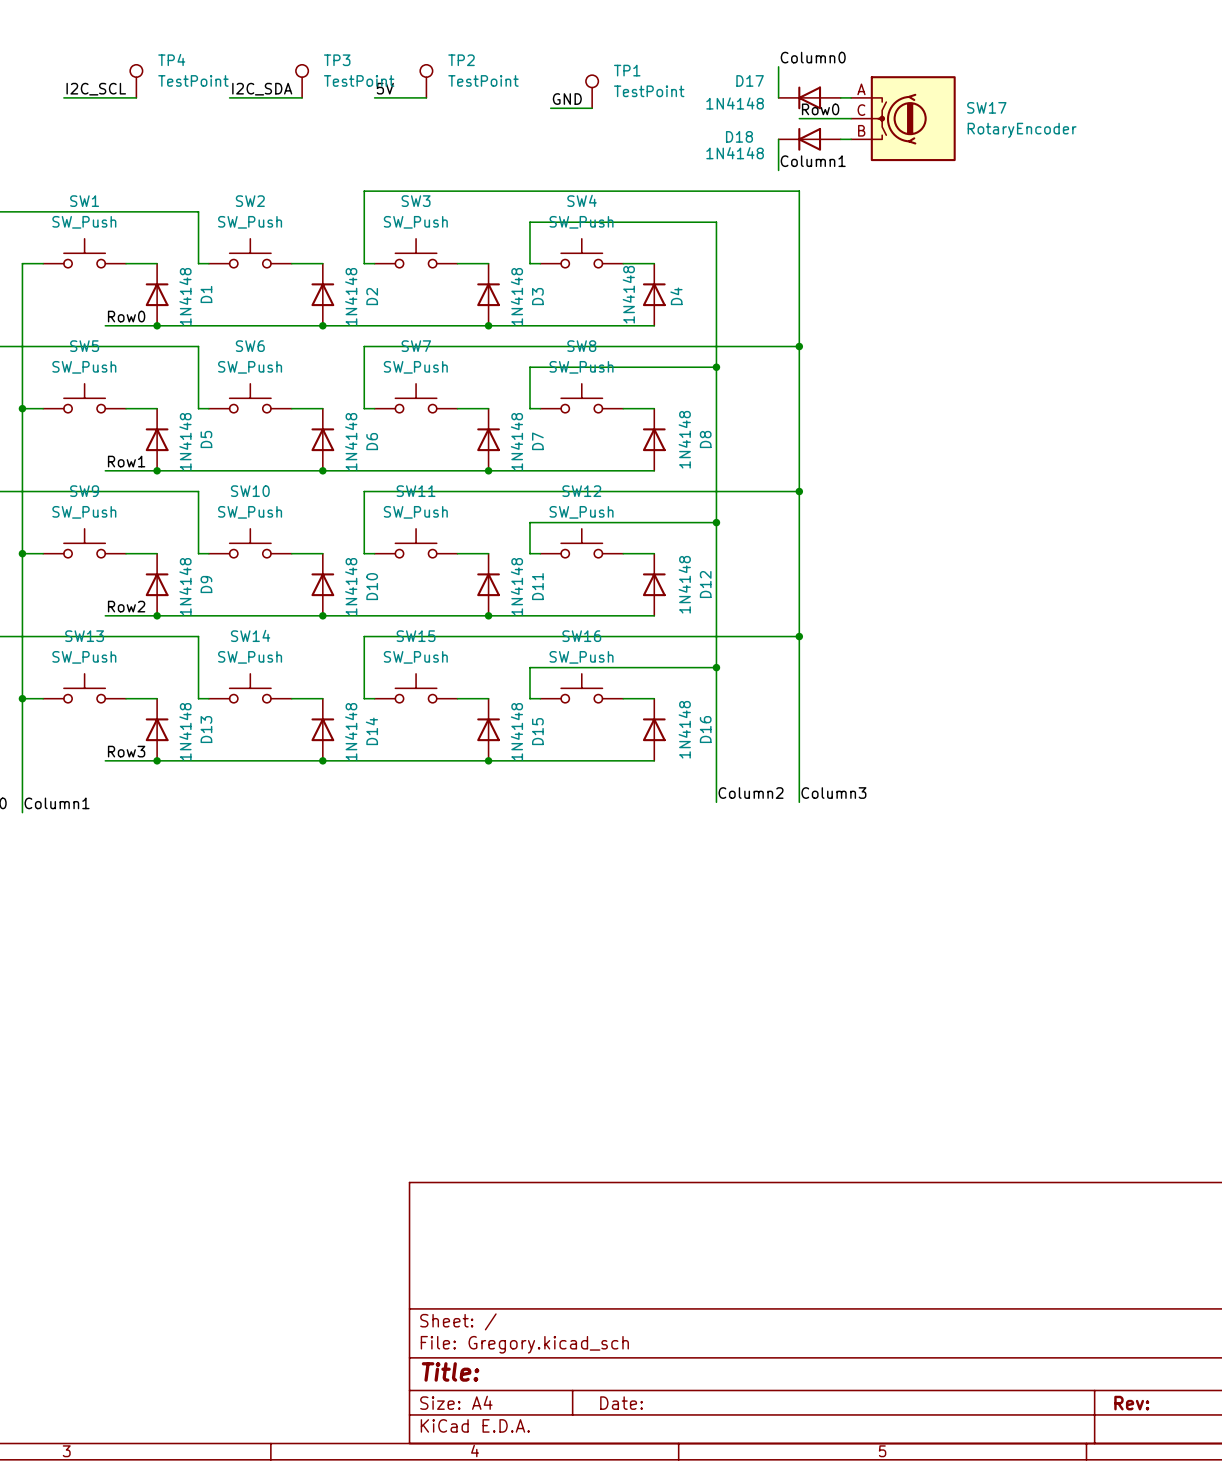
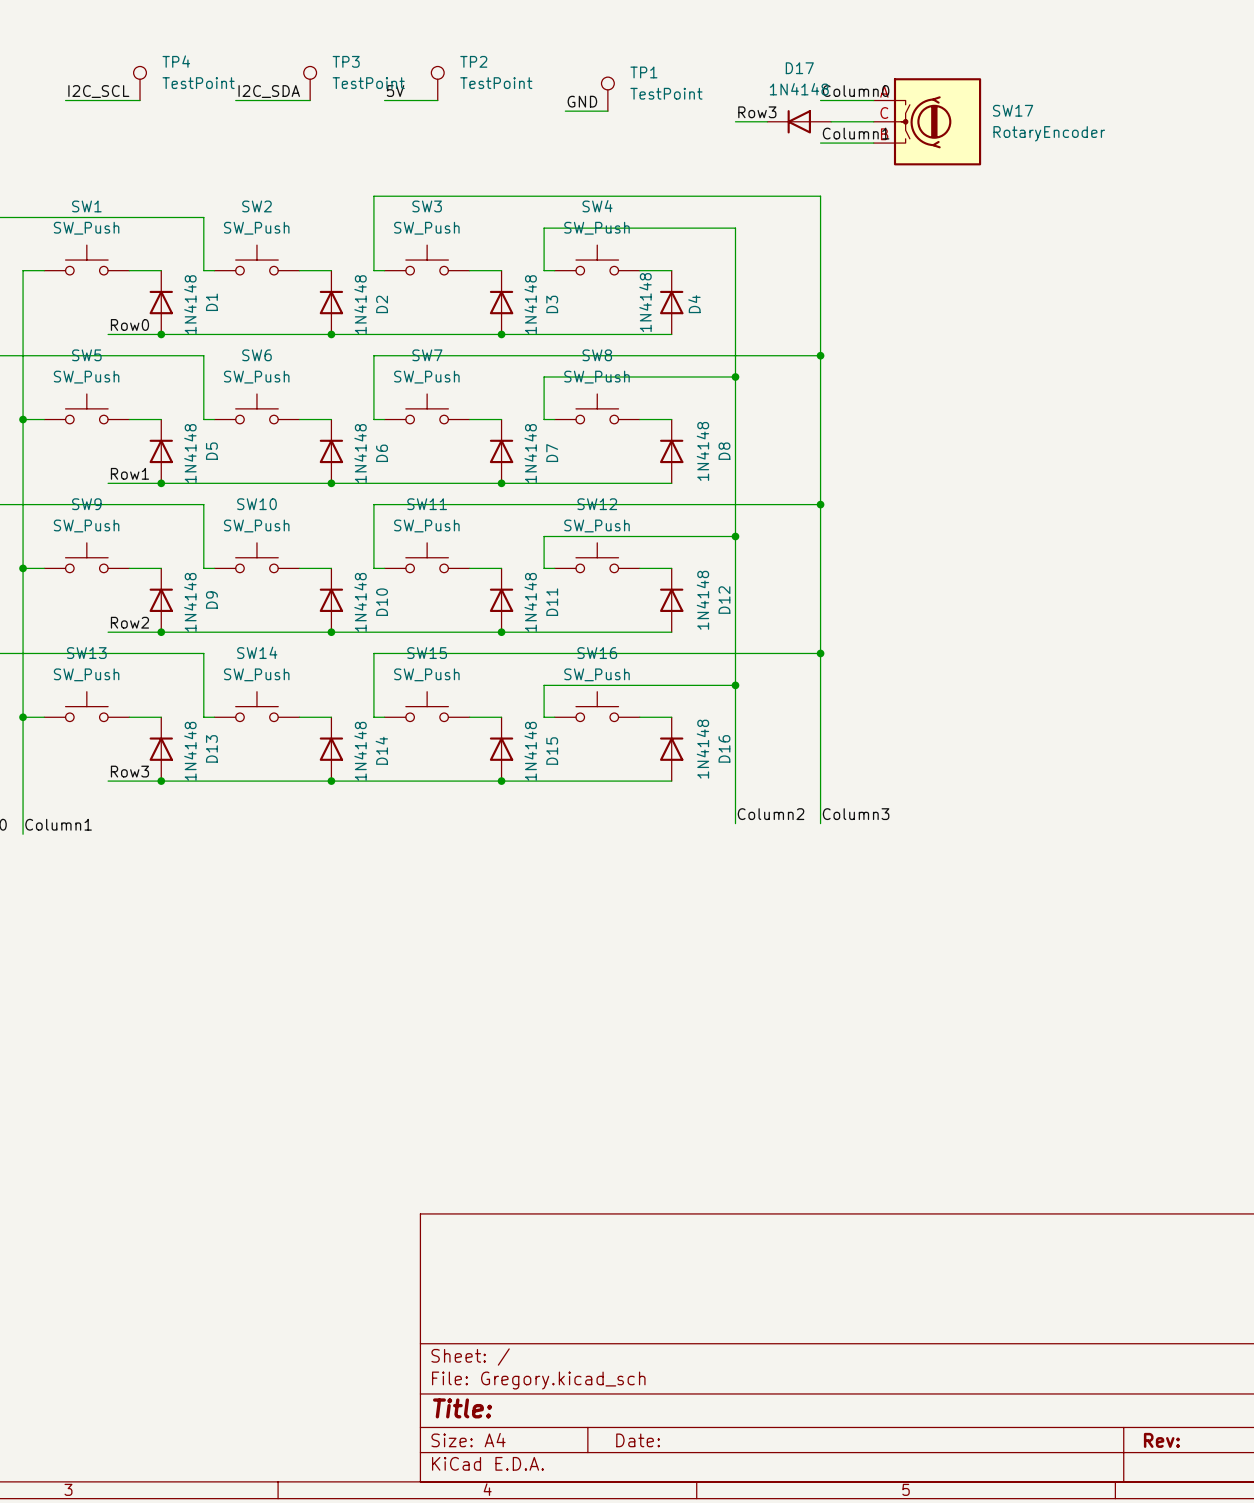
label position: Column0 (813, 57) -> Column0 (856, 91)
wire: (778, 66) (778, 97) -> none
D17 name position: D17 (750, 80) -> D17 (799, 68)
D17 position: (809, 97) -> (799, 121)
D17 value position: 1N4148 (735, 103) -> 1N4148 (799, 89)
label: none -> Row3 (757, 112)
label: Row0 (820, 109) -> none
wire: none -> (735, 121) (767, 121)
wire: (778, 139) (778, 170) -> none
D18: 1N4148 (809, 139) -> none
label position: Column1 (813, 161) -> Column1 (856, 133)

